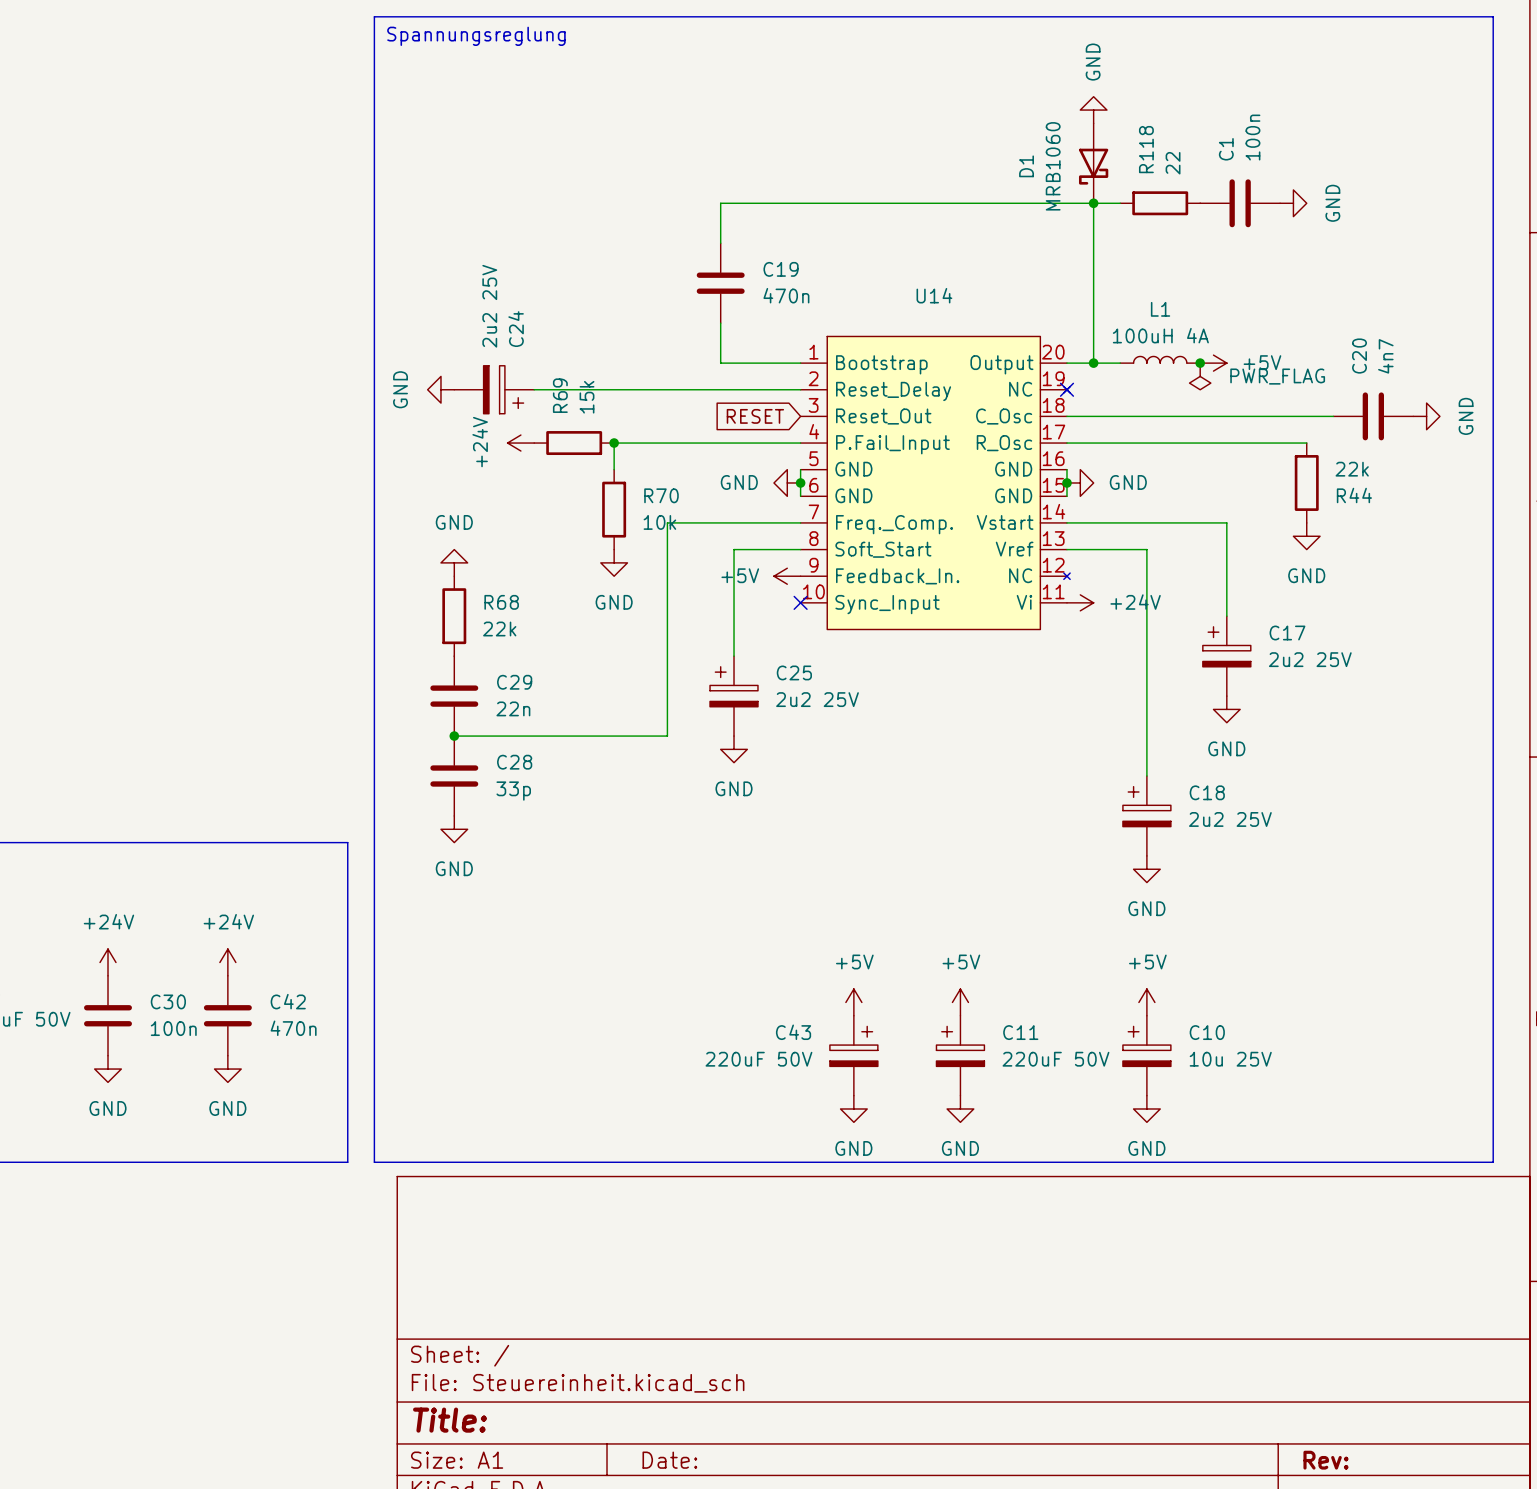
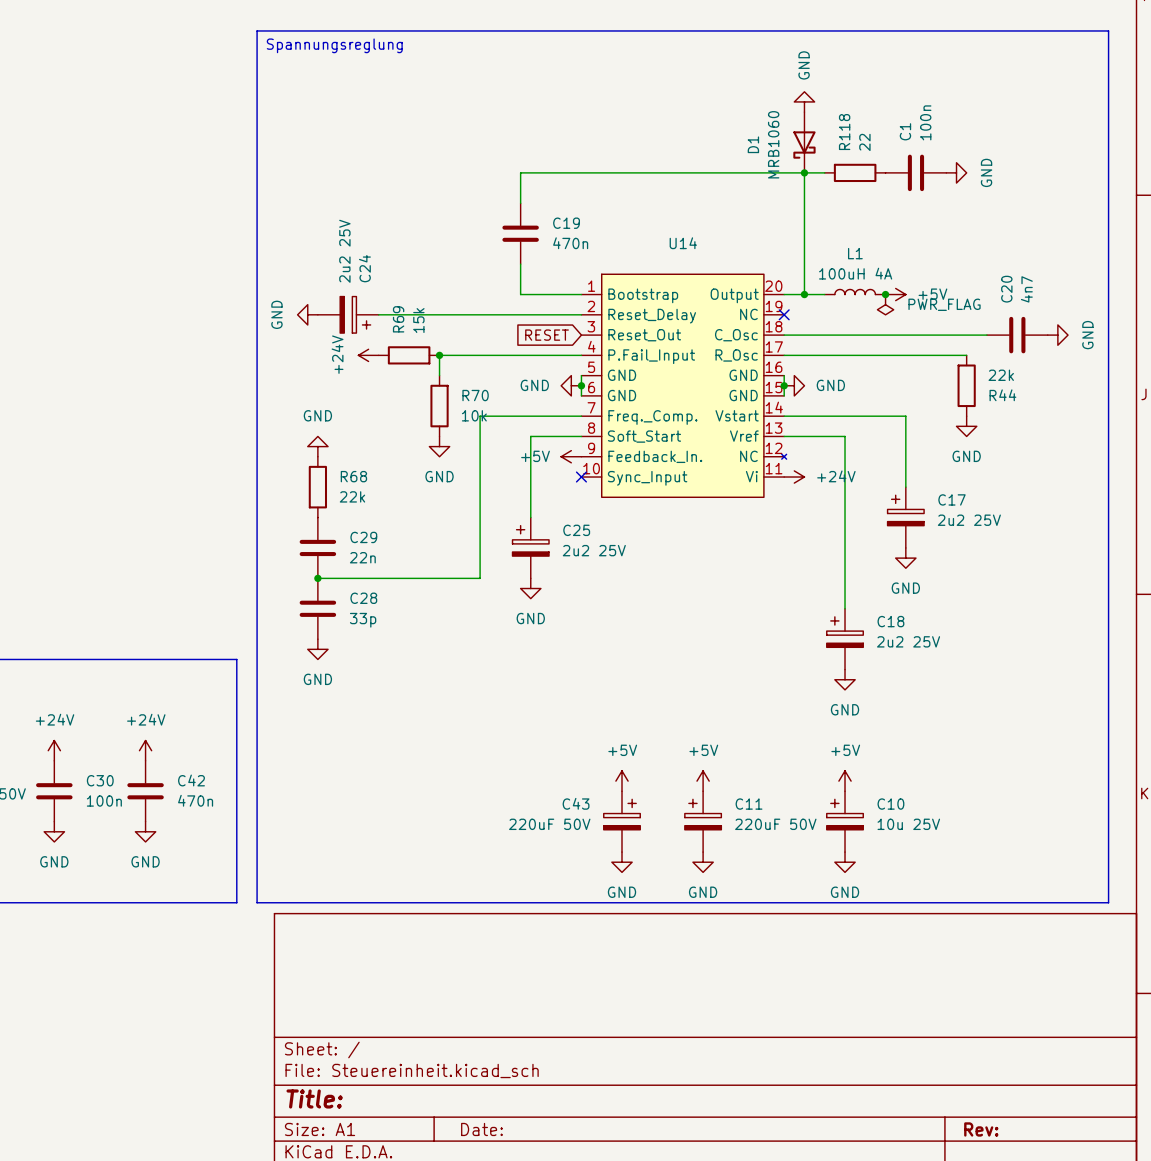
U14 symbol: [800, 336, 1071, 630] -> [581, 274, 787, 498]

